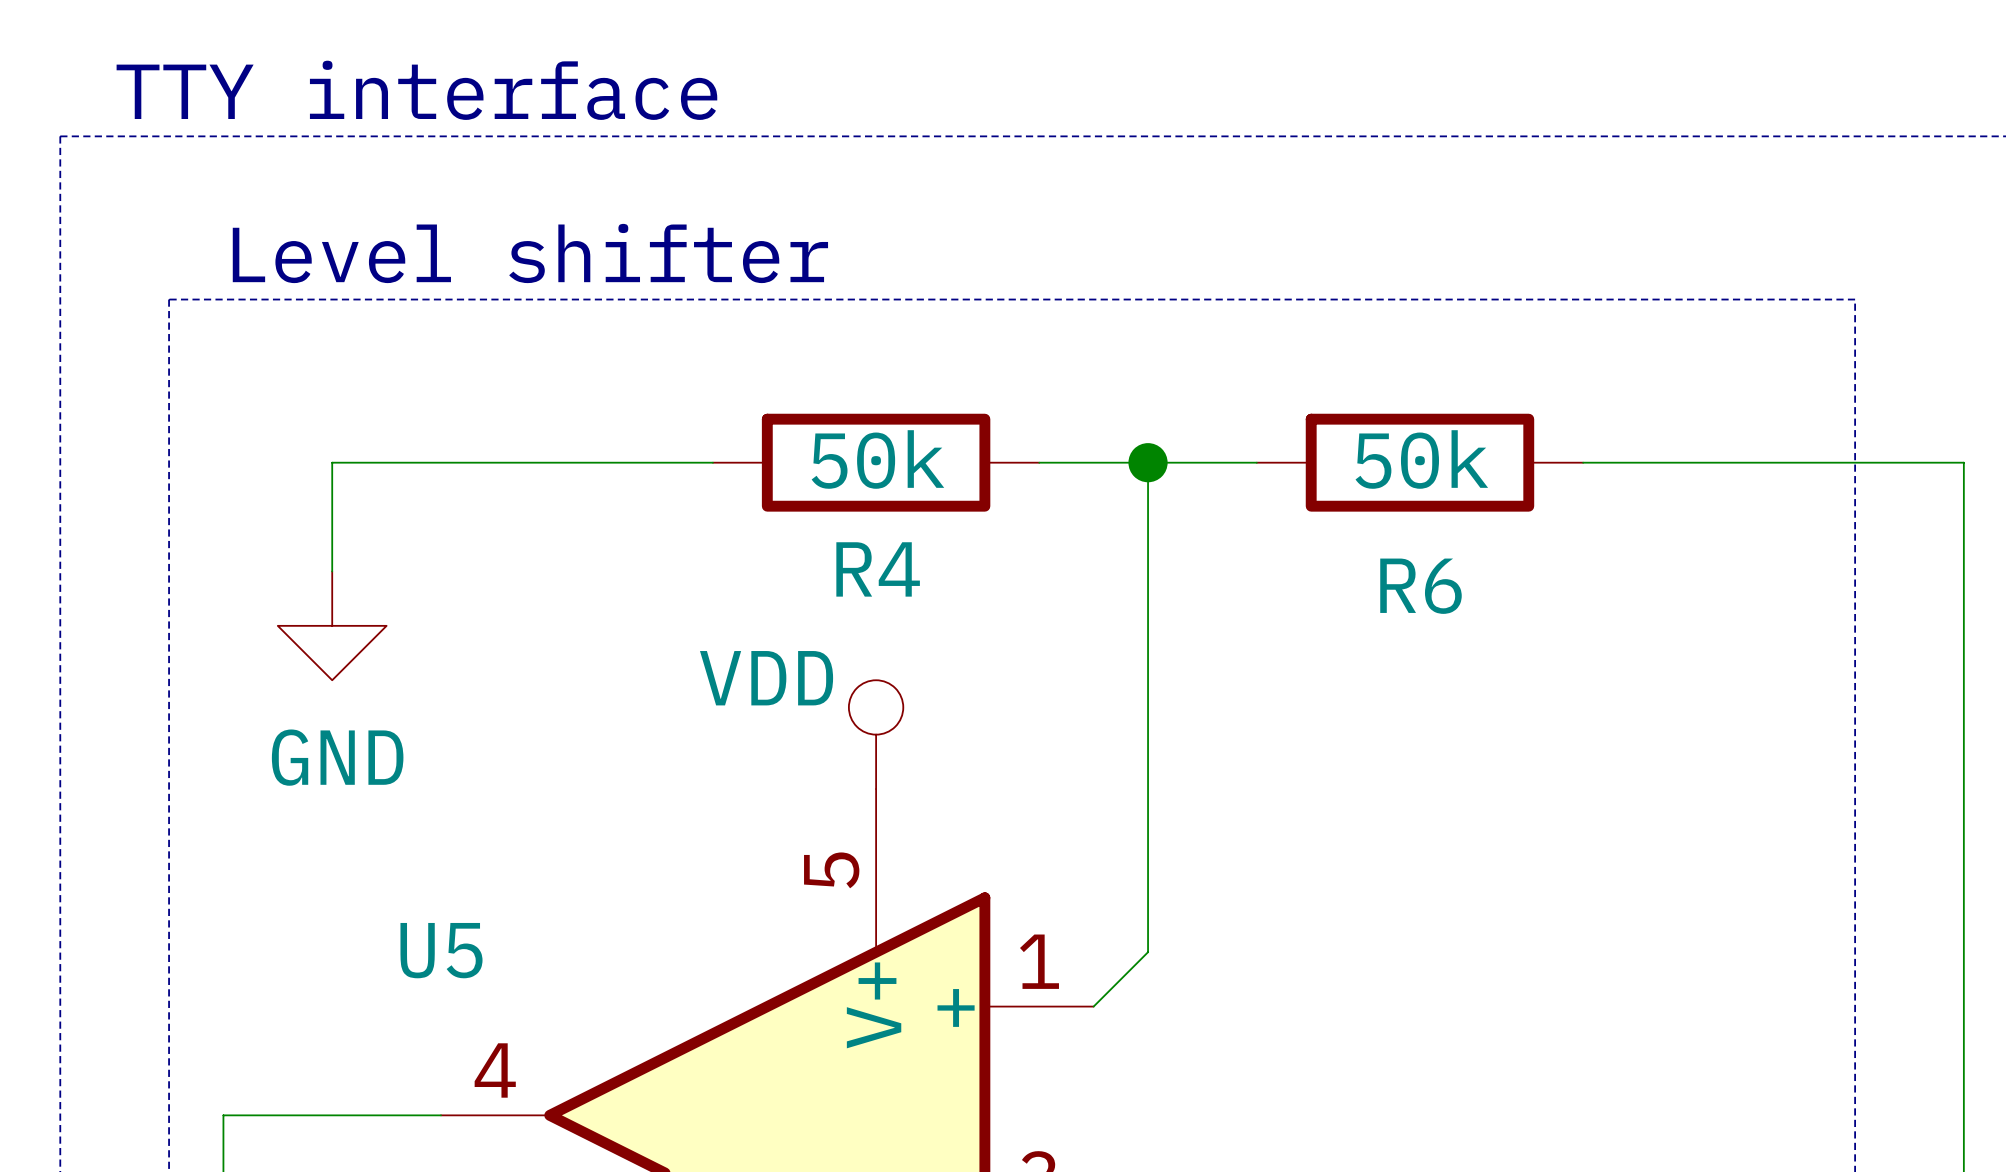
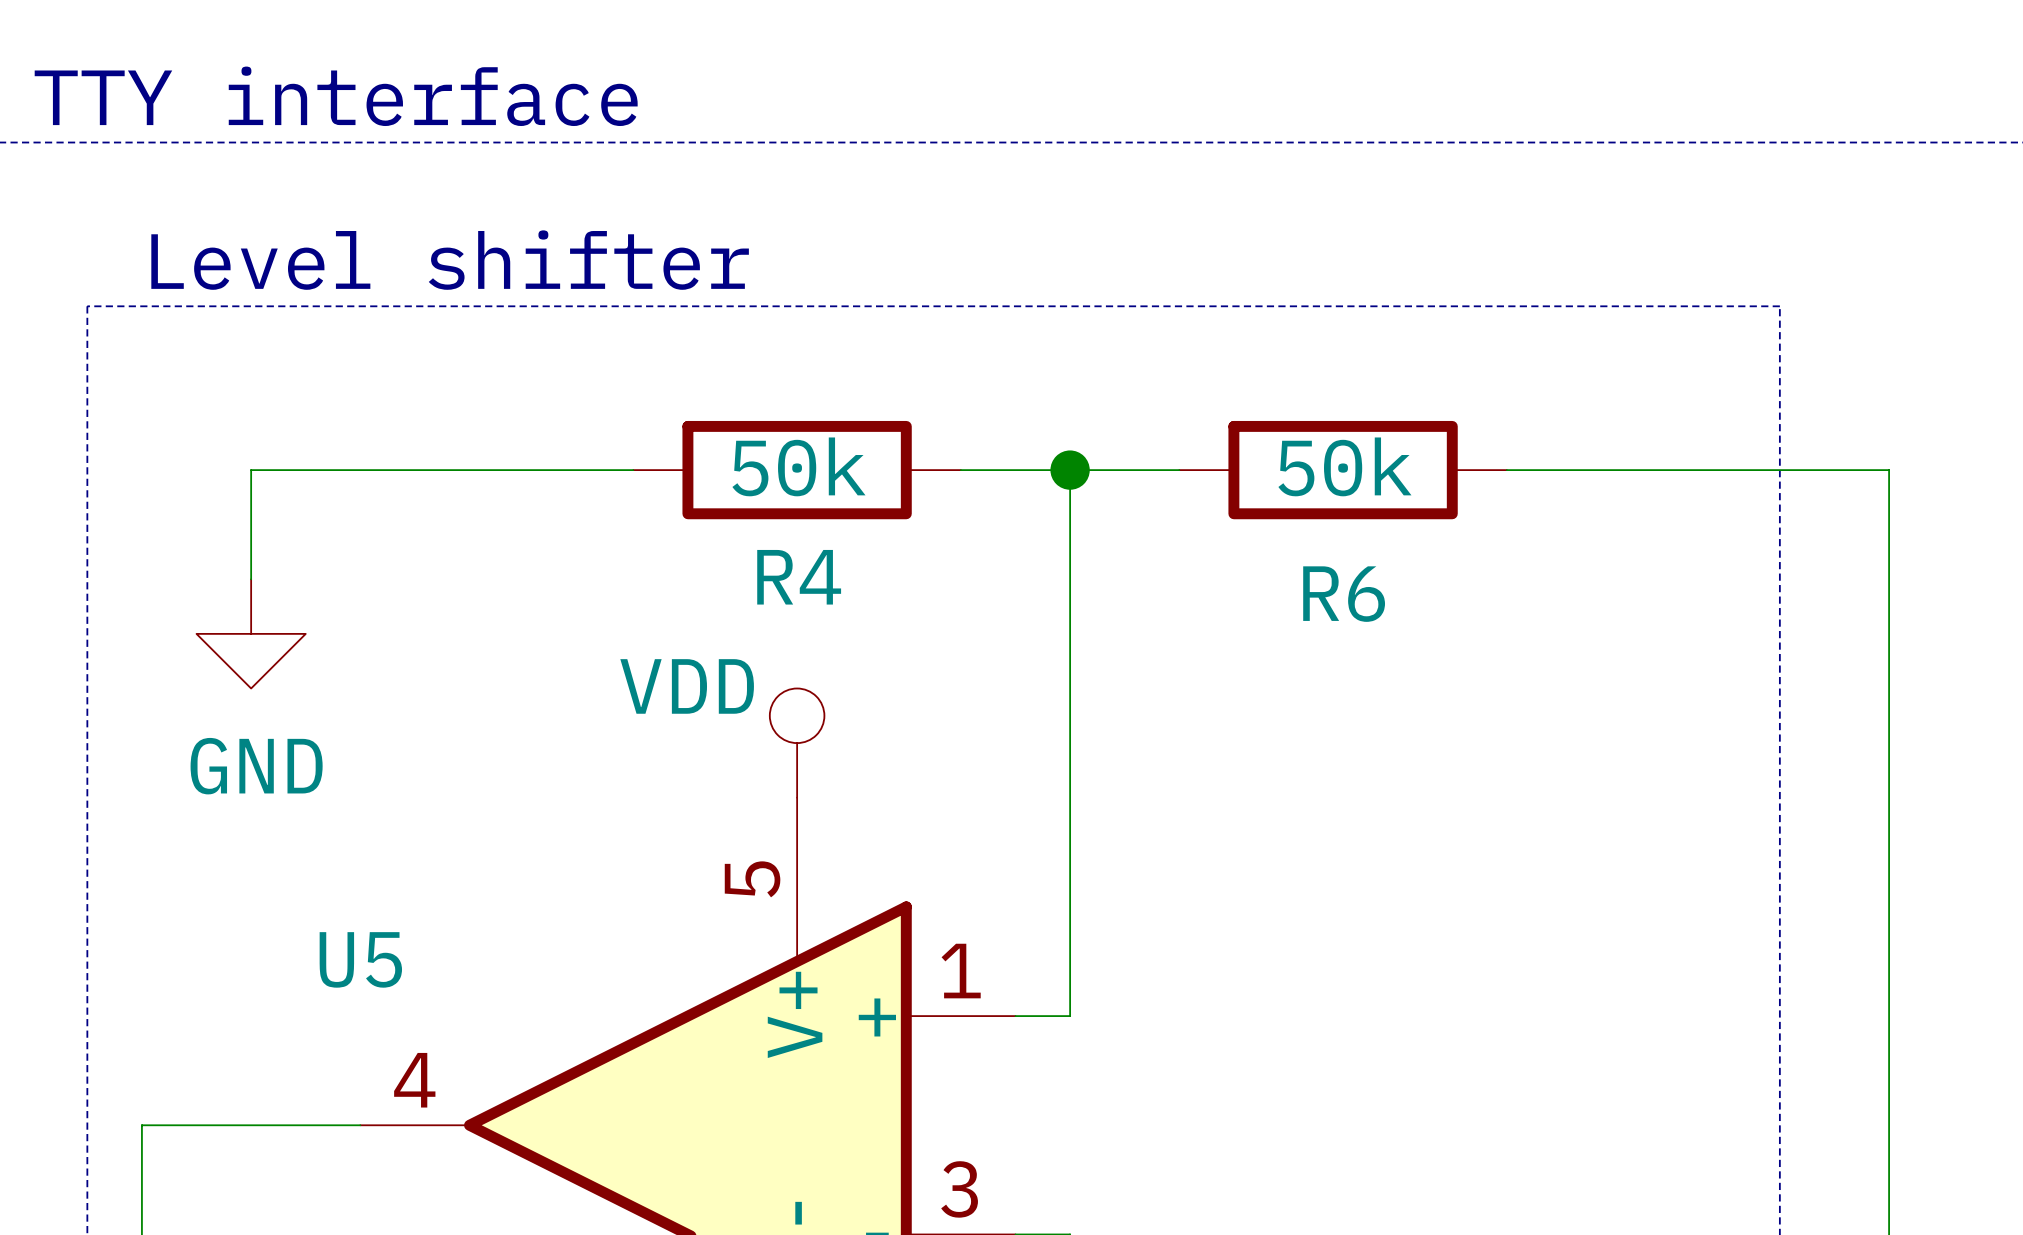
wire: (1148, 952) (1093, 1006) -> (1070, 961) (1070, 1016) (1015, 1016)

